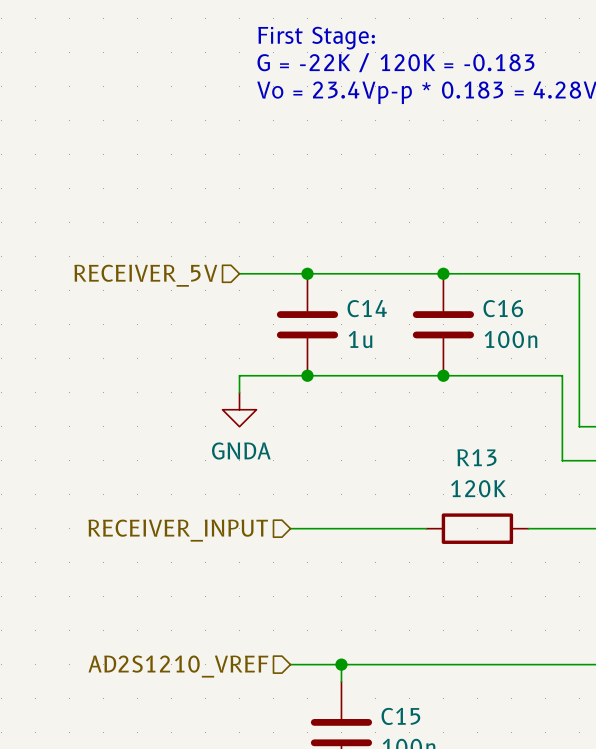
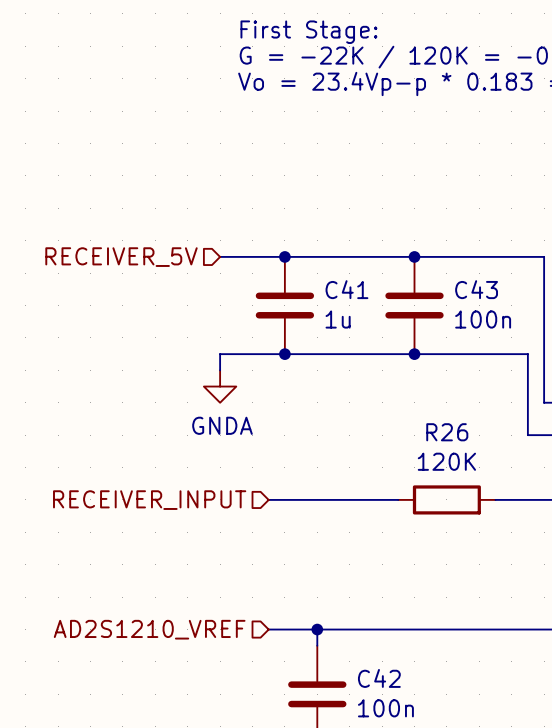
C14 name: C14 (367, 308) -> C41 (346, 289)
C16 name: C16 (503, 308) -> C43 (476, 289)
R13 name: R13 (476, 457) -> R26 (447, 432)
C15 name: C15 (400, 716) -> C42 (379, 678)

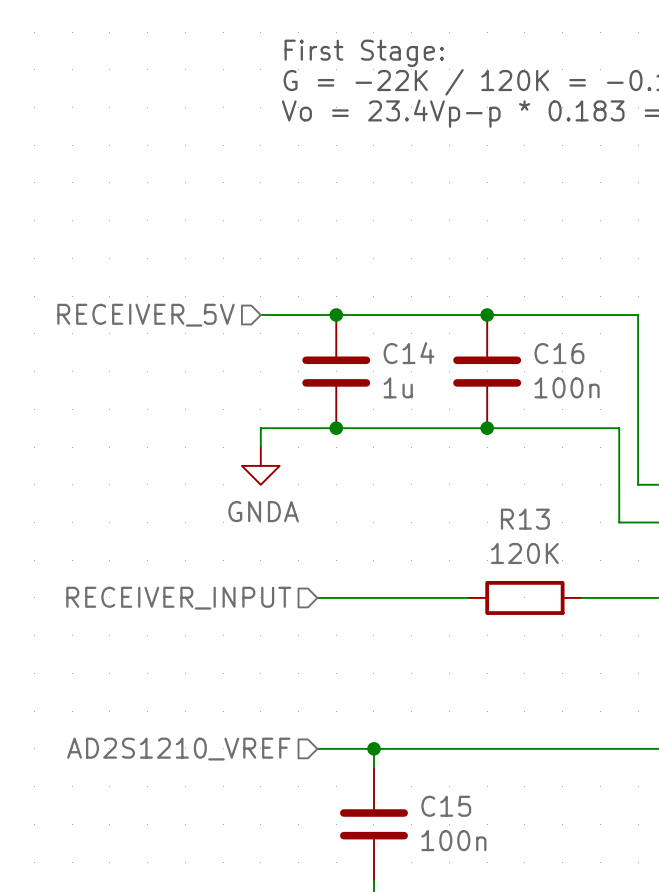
C41 name: C41 (346, 289) -> C14 (408, 353)
C43 name: C43 (476, 289) -> C16 (559, 353)
R26 name: R26 (447, 432) -> R13 (525, 519)
C42 name: C42 (379, 678) -> C15 (446, 806)

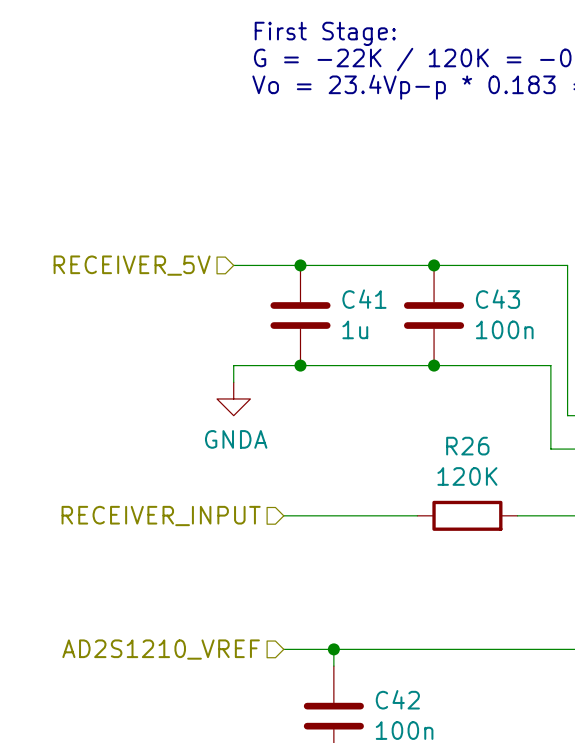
C14 name: C14 (408, 353) -> C41 (364, 299)
C16 name: C16 (559, 353) -> C43 (497, 299)
R13 name: R13 (525, 519) -> R26 (467, 446)
C15 name: C15 (446, 806) -> C42 (397, 699)

